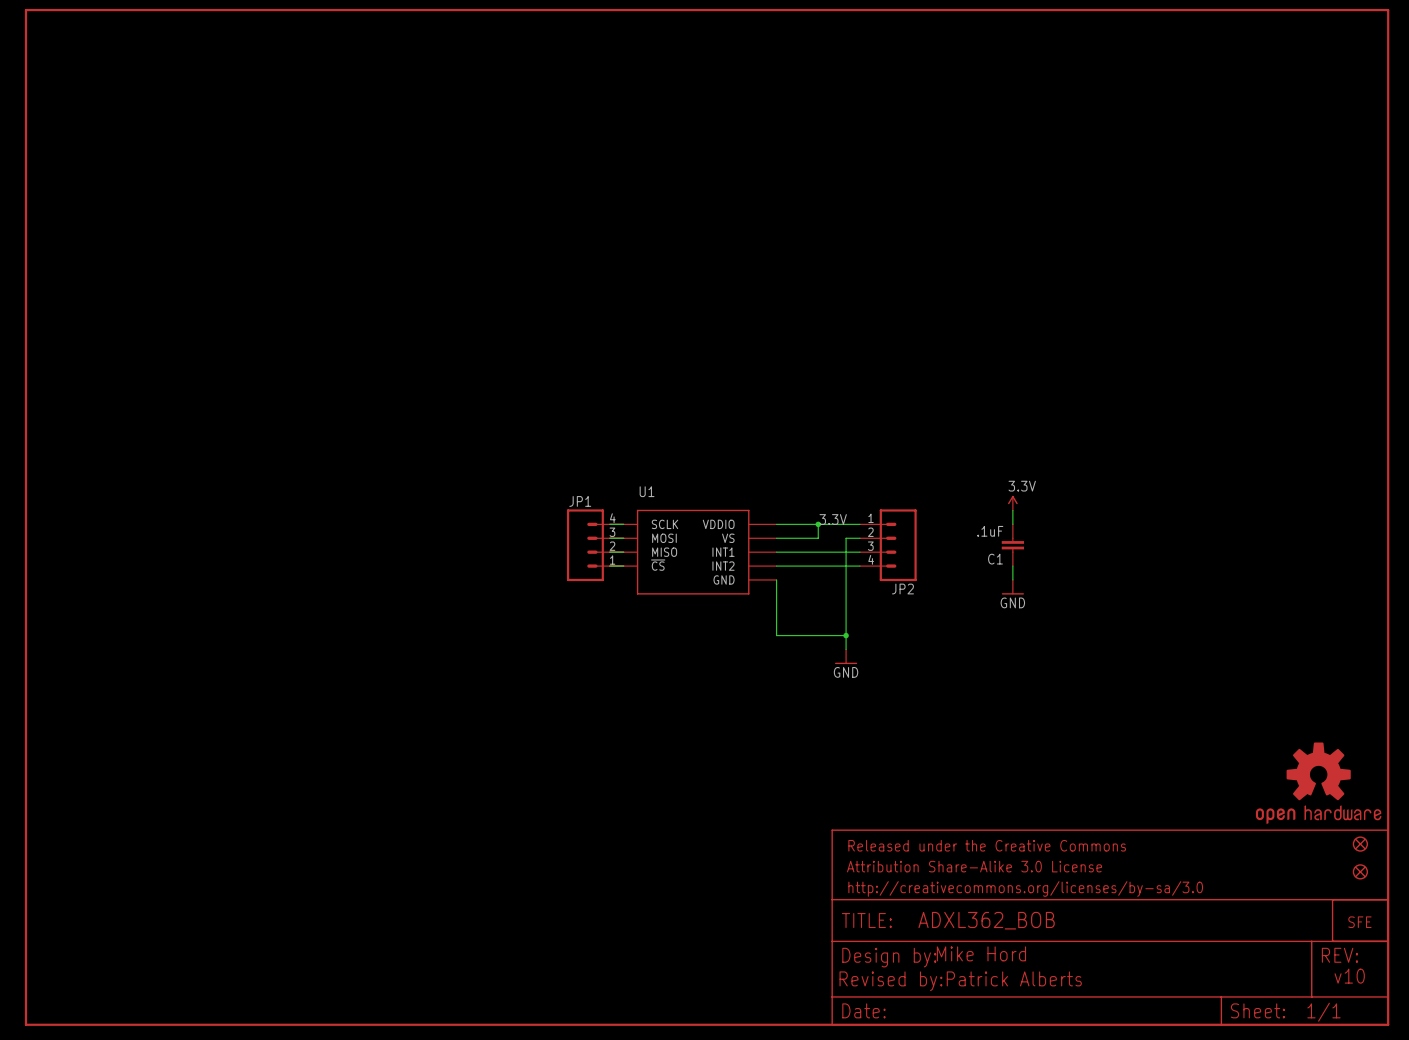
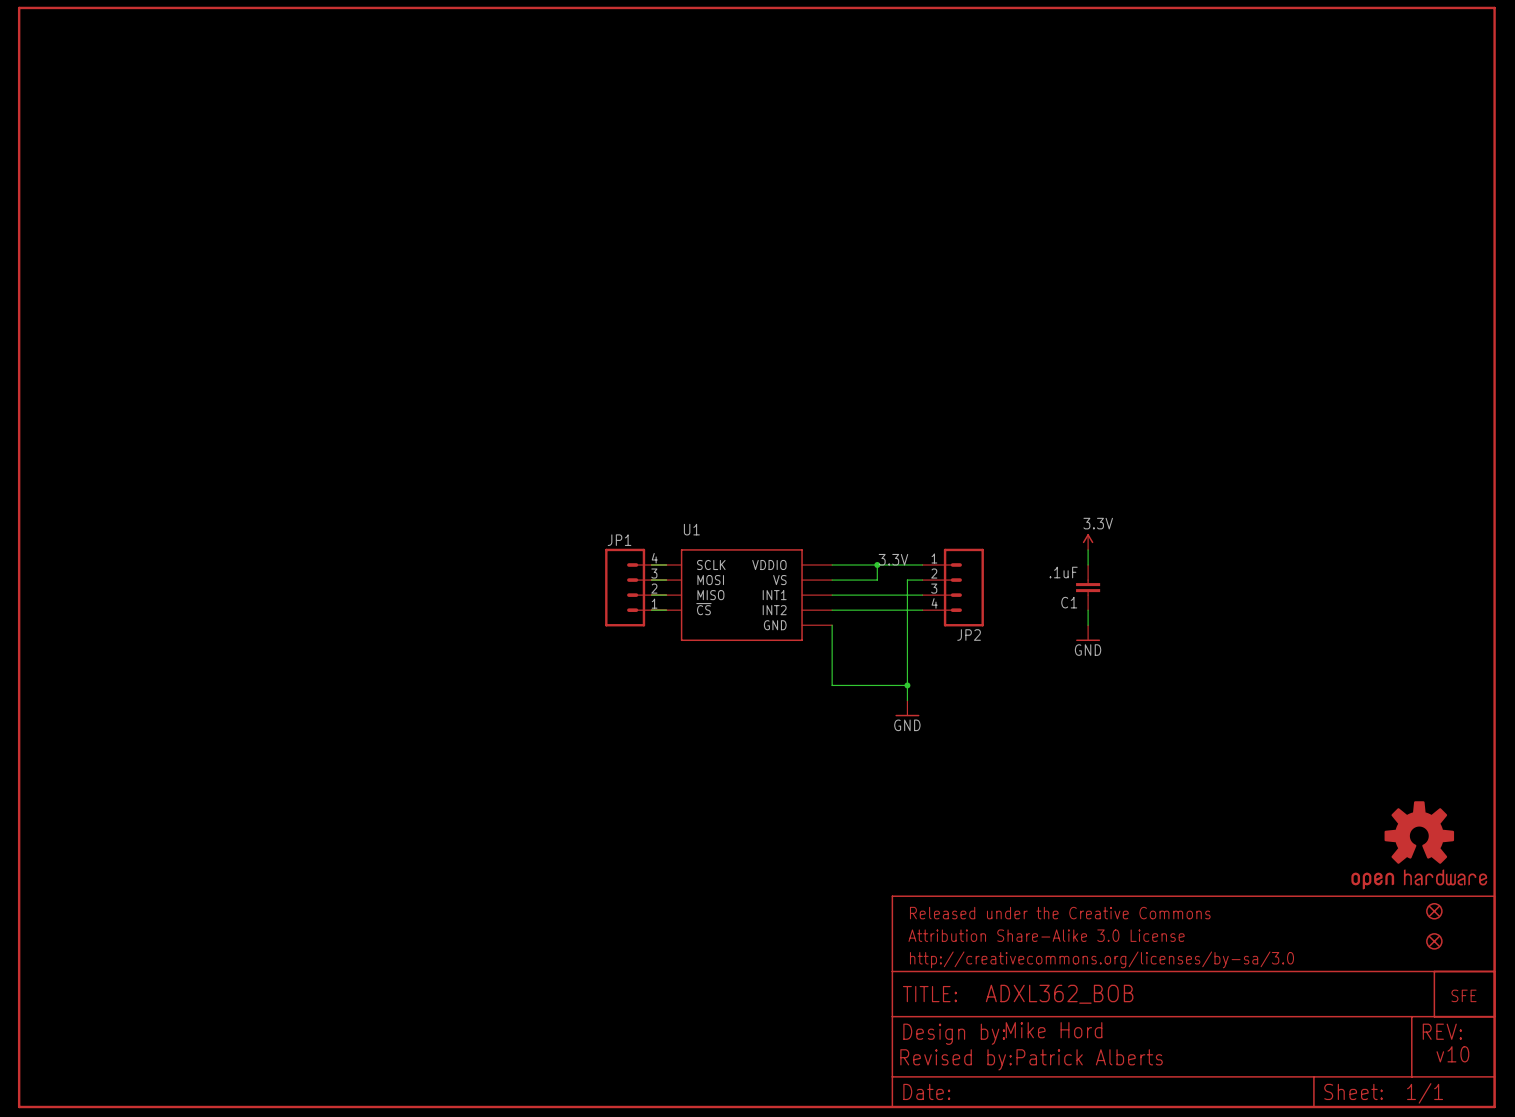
part: none -> (1434, 911)
part: (1360, 844) -> none
part: none -> (1434, 941)
part: (1360, 871) -> none

